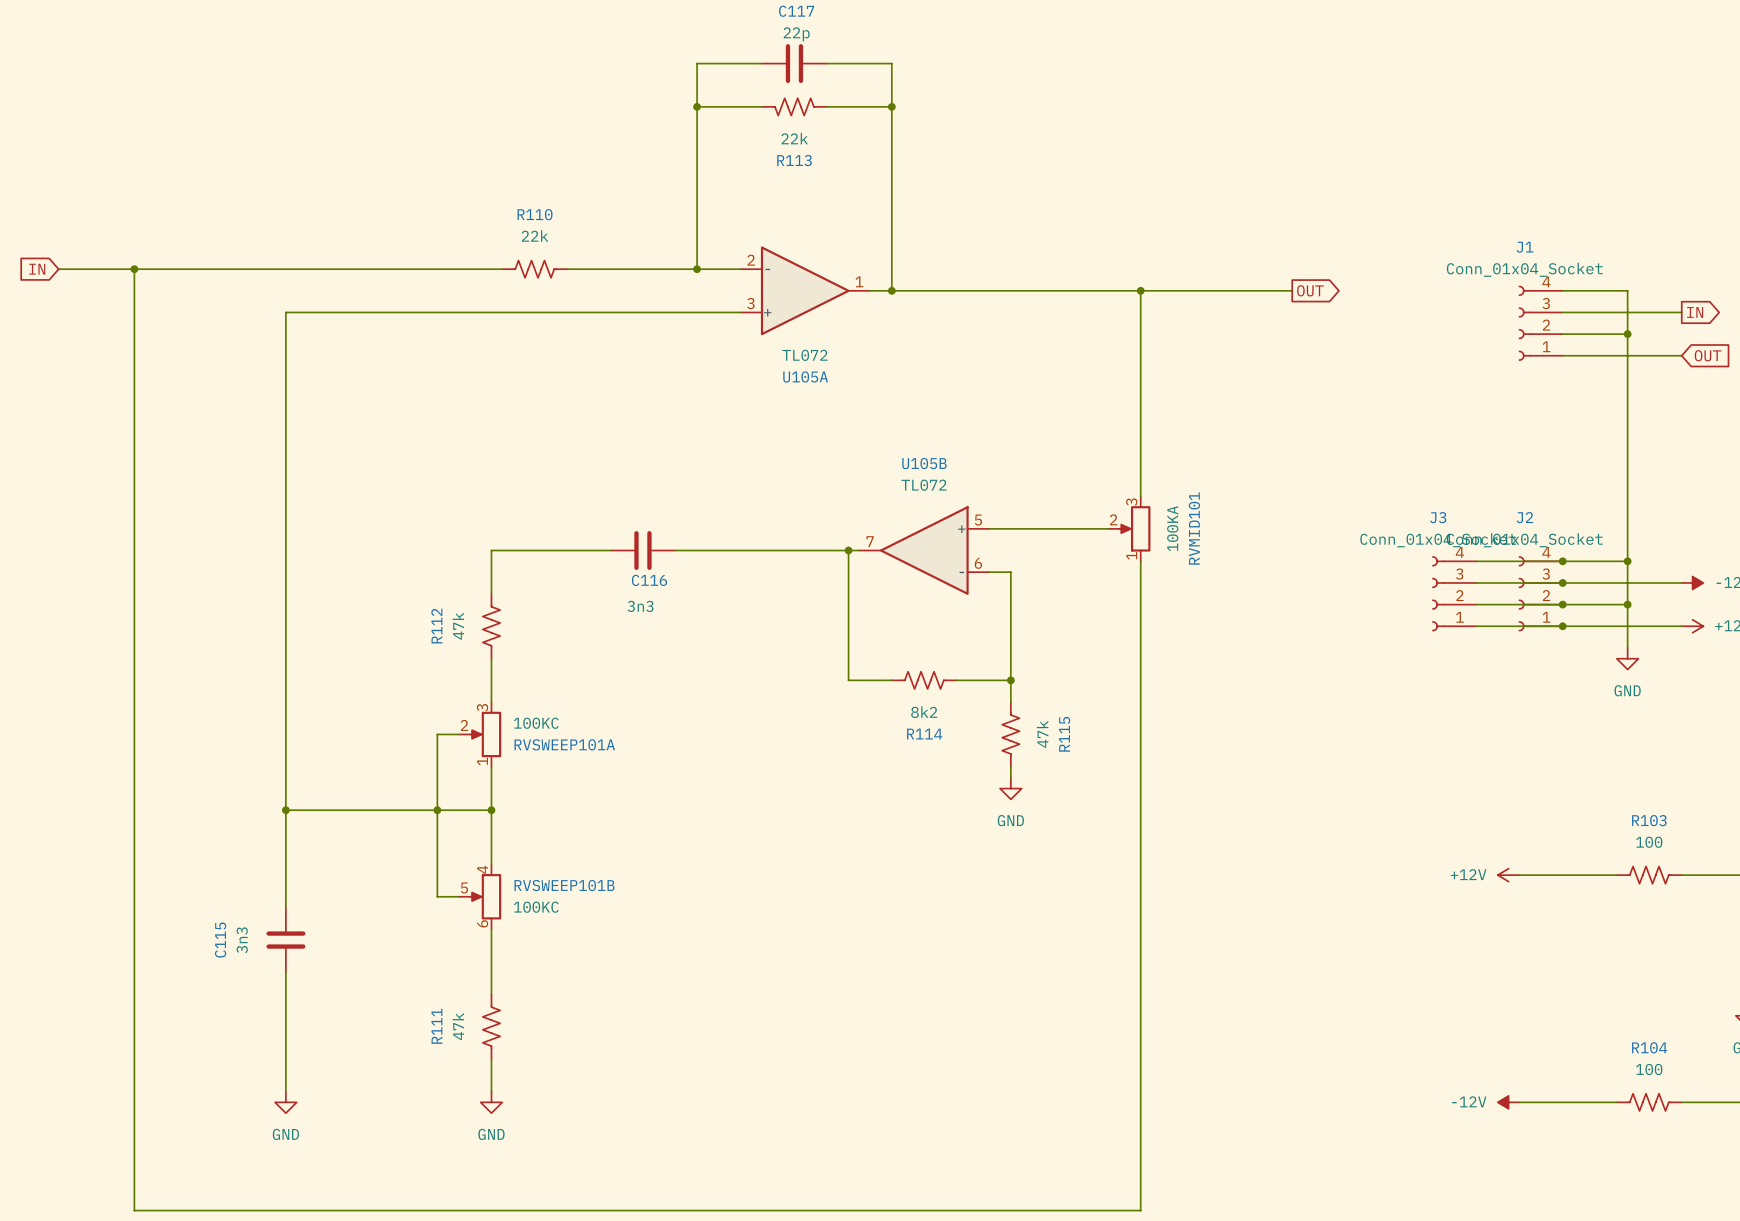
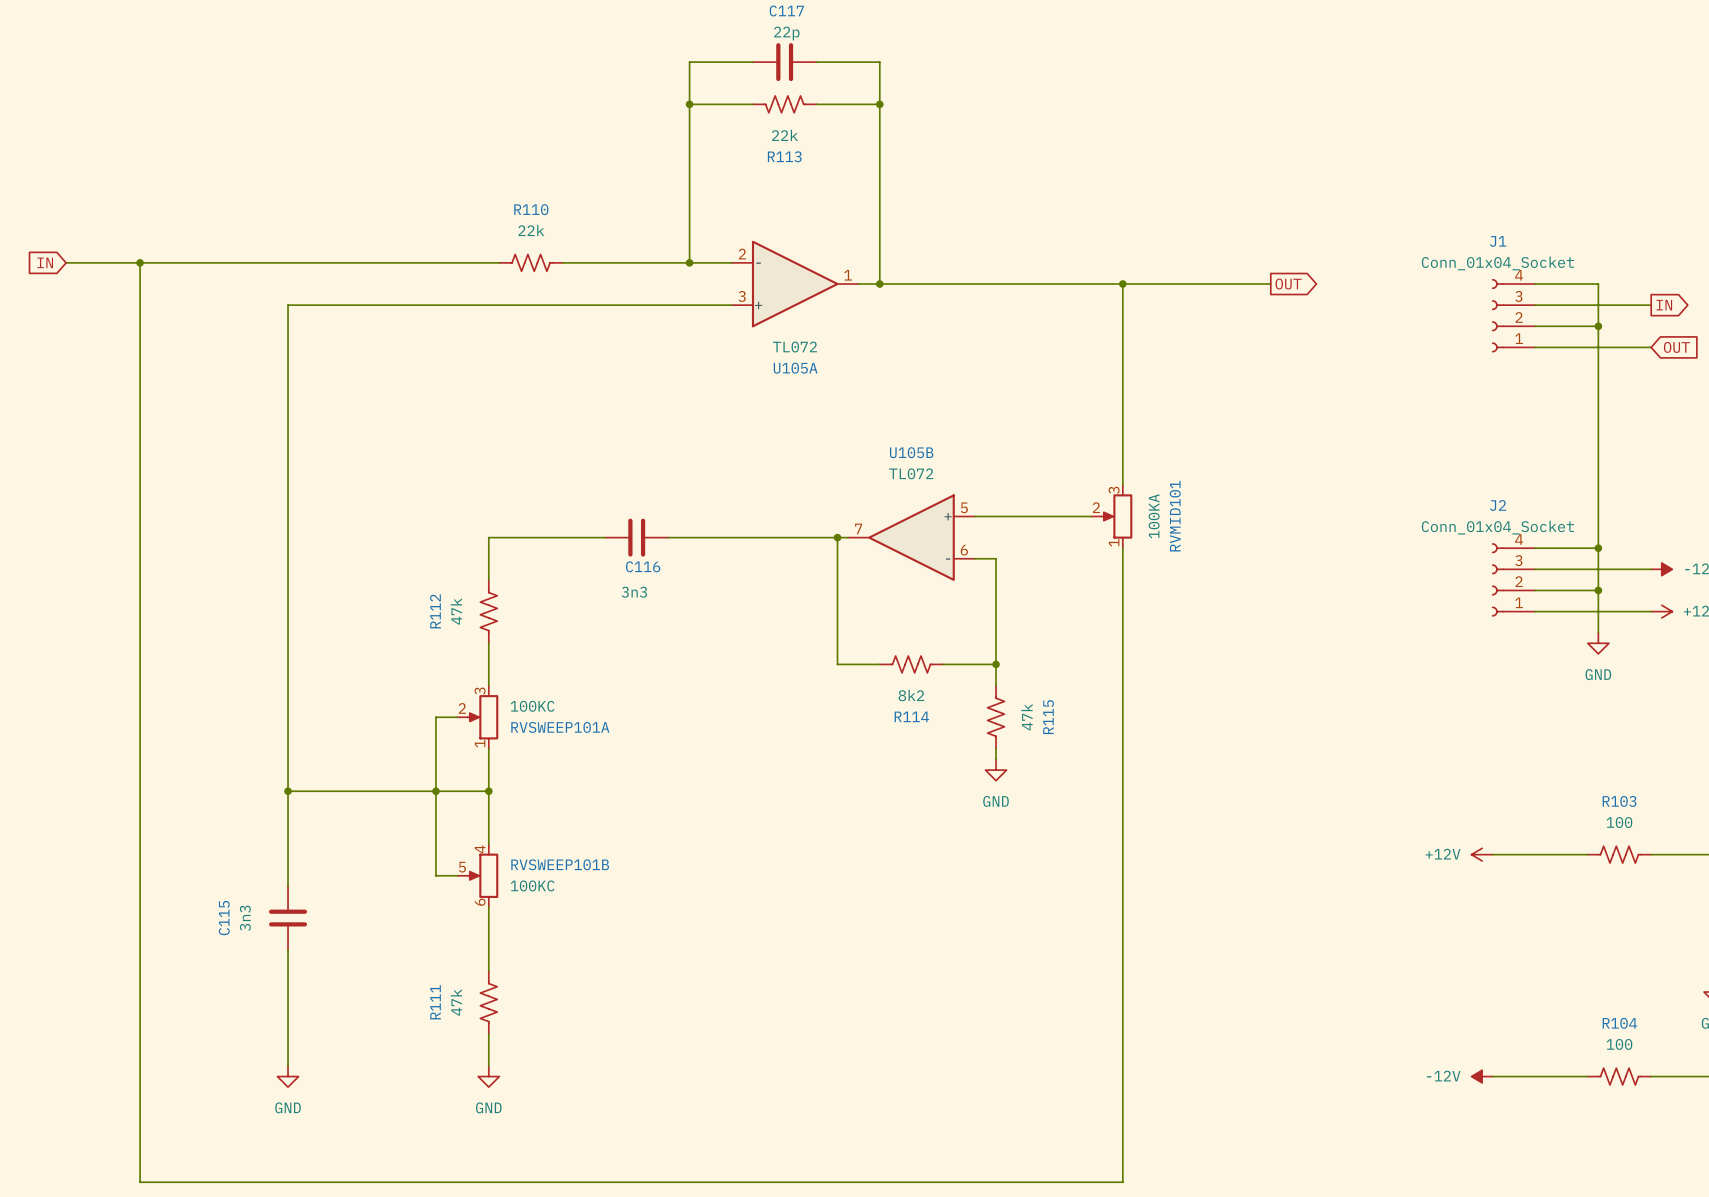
wire: (1476, 561) (1562, 561) -> none
junction: (1562, 561) -> none
wire: (1476, 582) (1562, 582) -> none
junction: (1562, 582) -> none
J3: Conn_01x04_Socket (1454, 593) -> none
wire: (1476, 604) (1562, 604) -> none
junction: (1562, 604) -> none
wire: (1476, 626) (1562, 626) -> none
junction: (1562, 626) -> none

